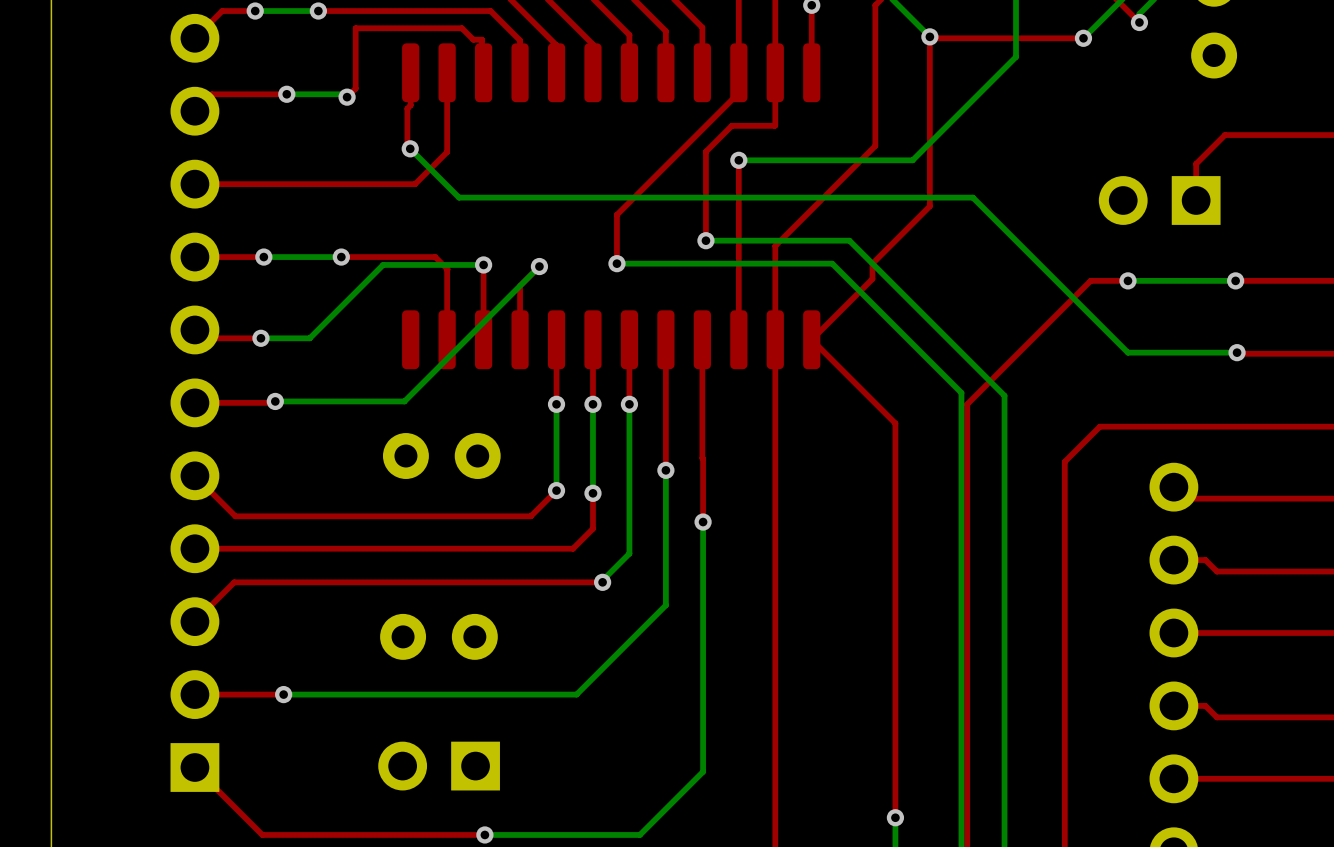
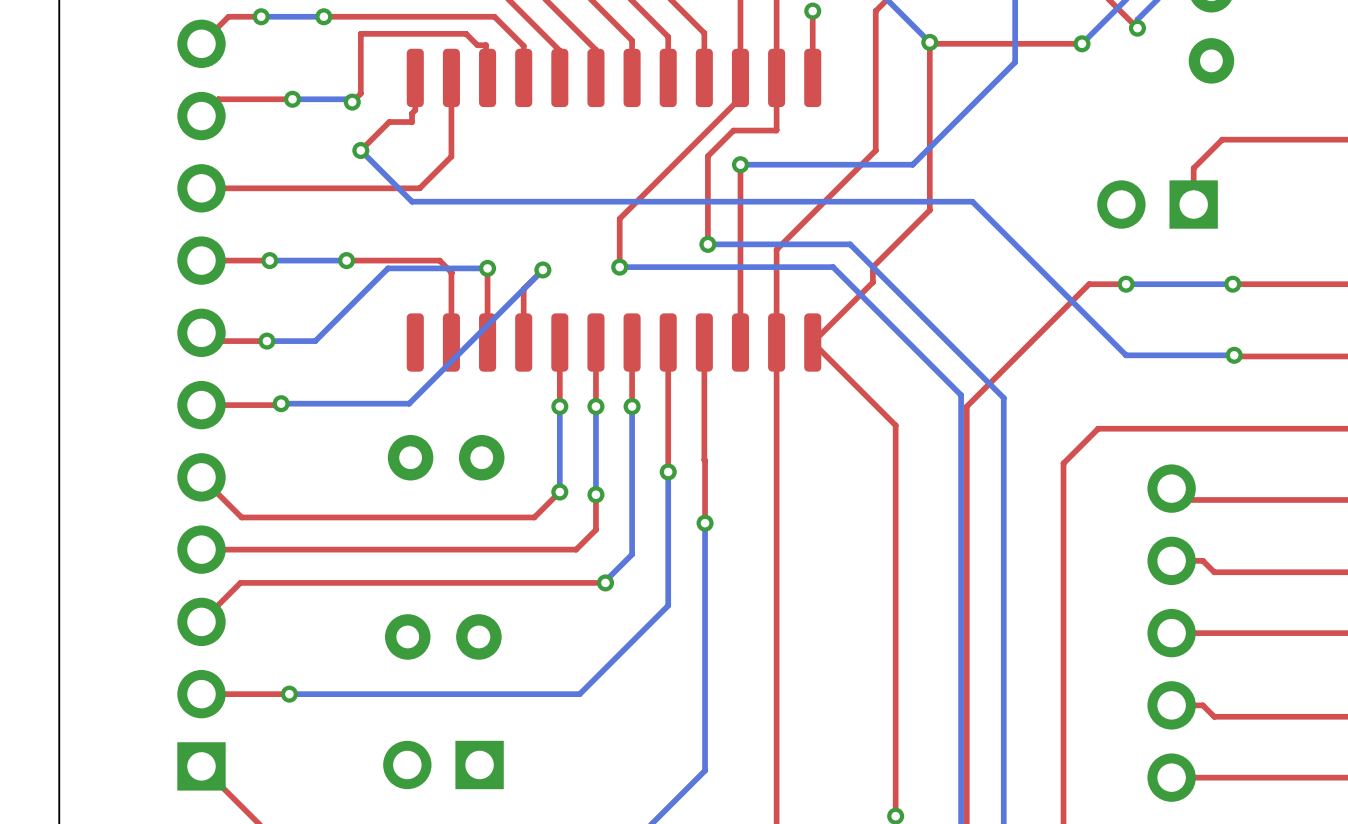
top track: (407, 117) (407, 145) (410, 148) -> (412, 122) (389, 122) (360, 150)
bottom track: (410, 148) (459, 197) -> (360, 150) (412, 201) (463, 201)
via position: (410, 148) -> (360, 150)

